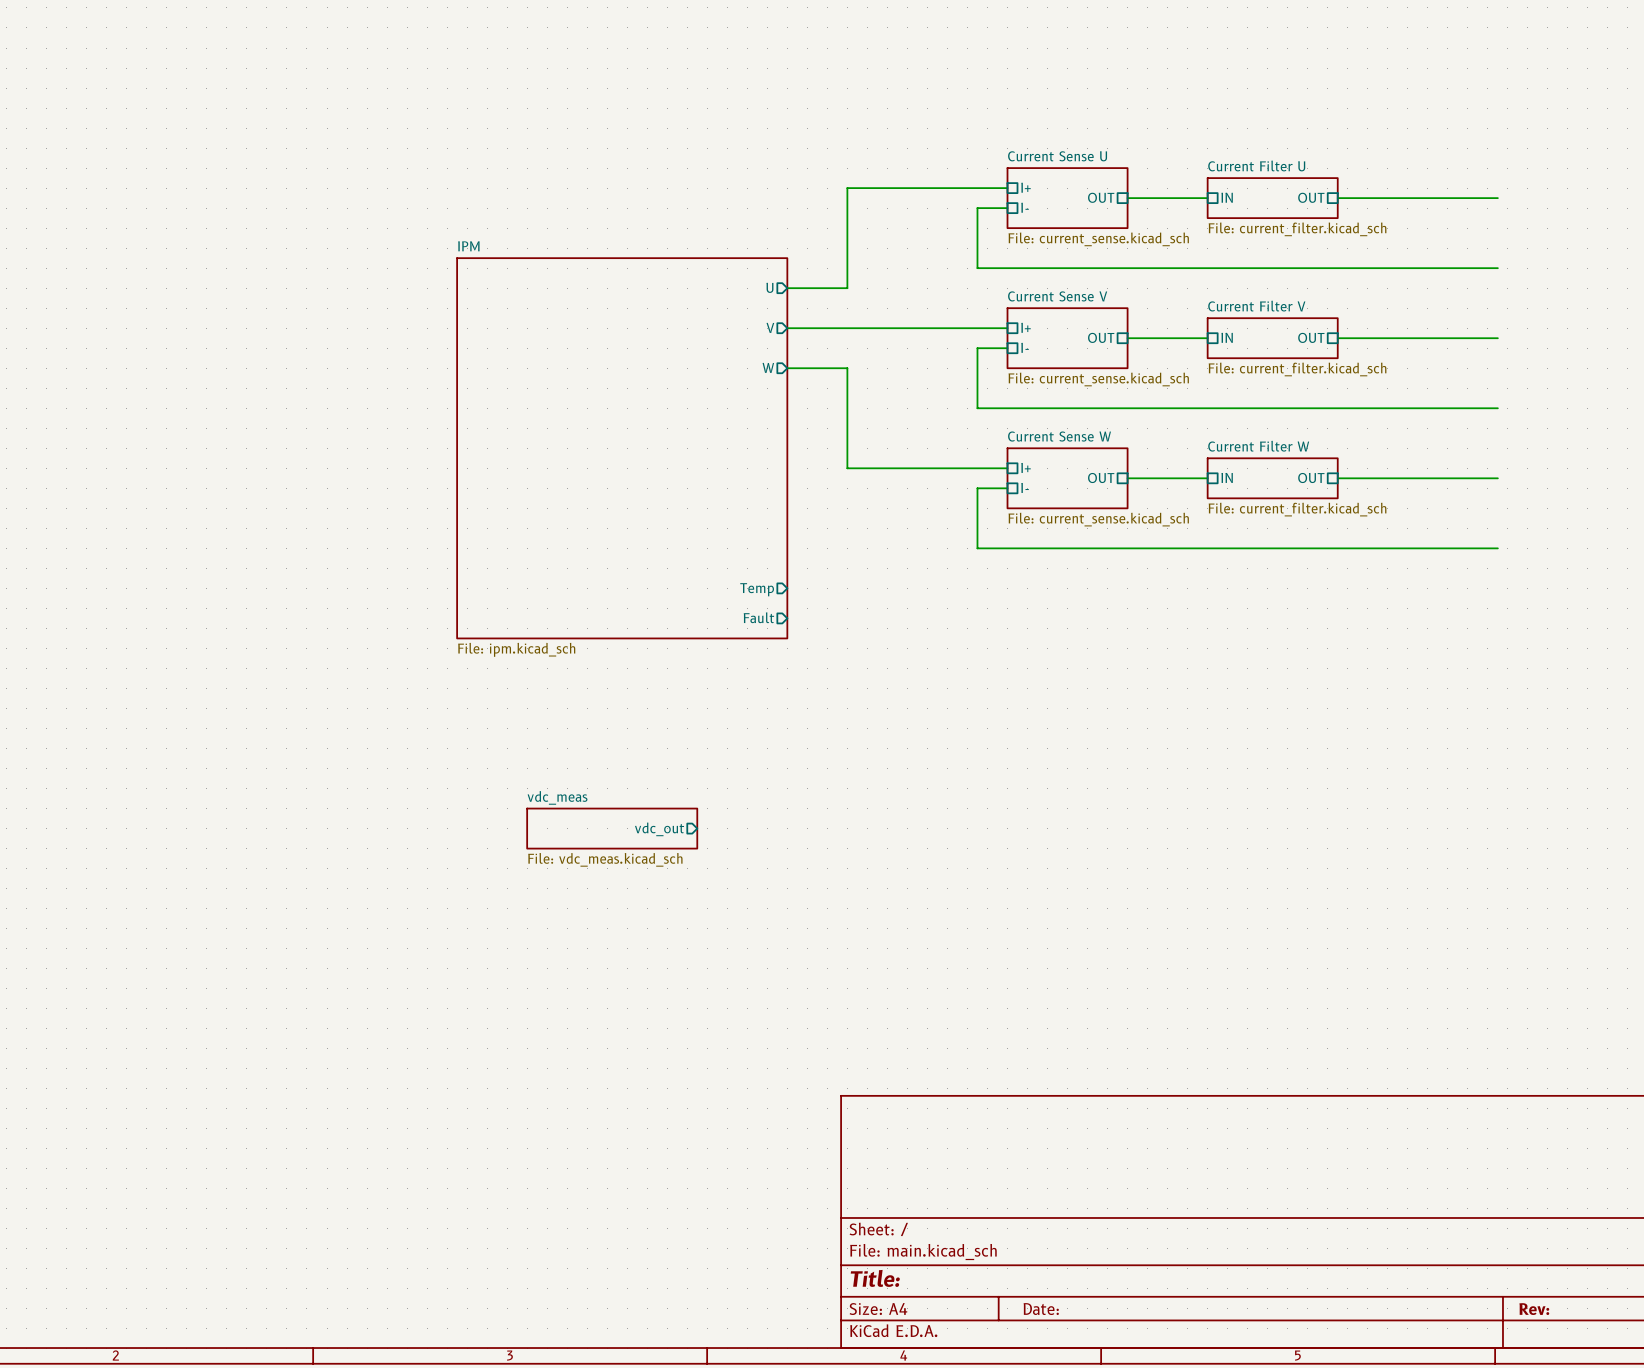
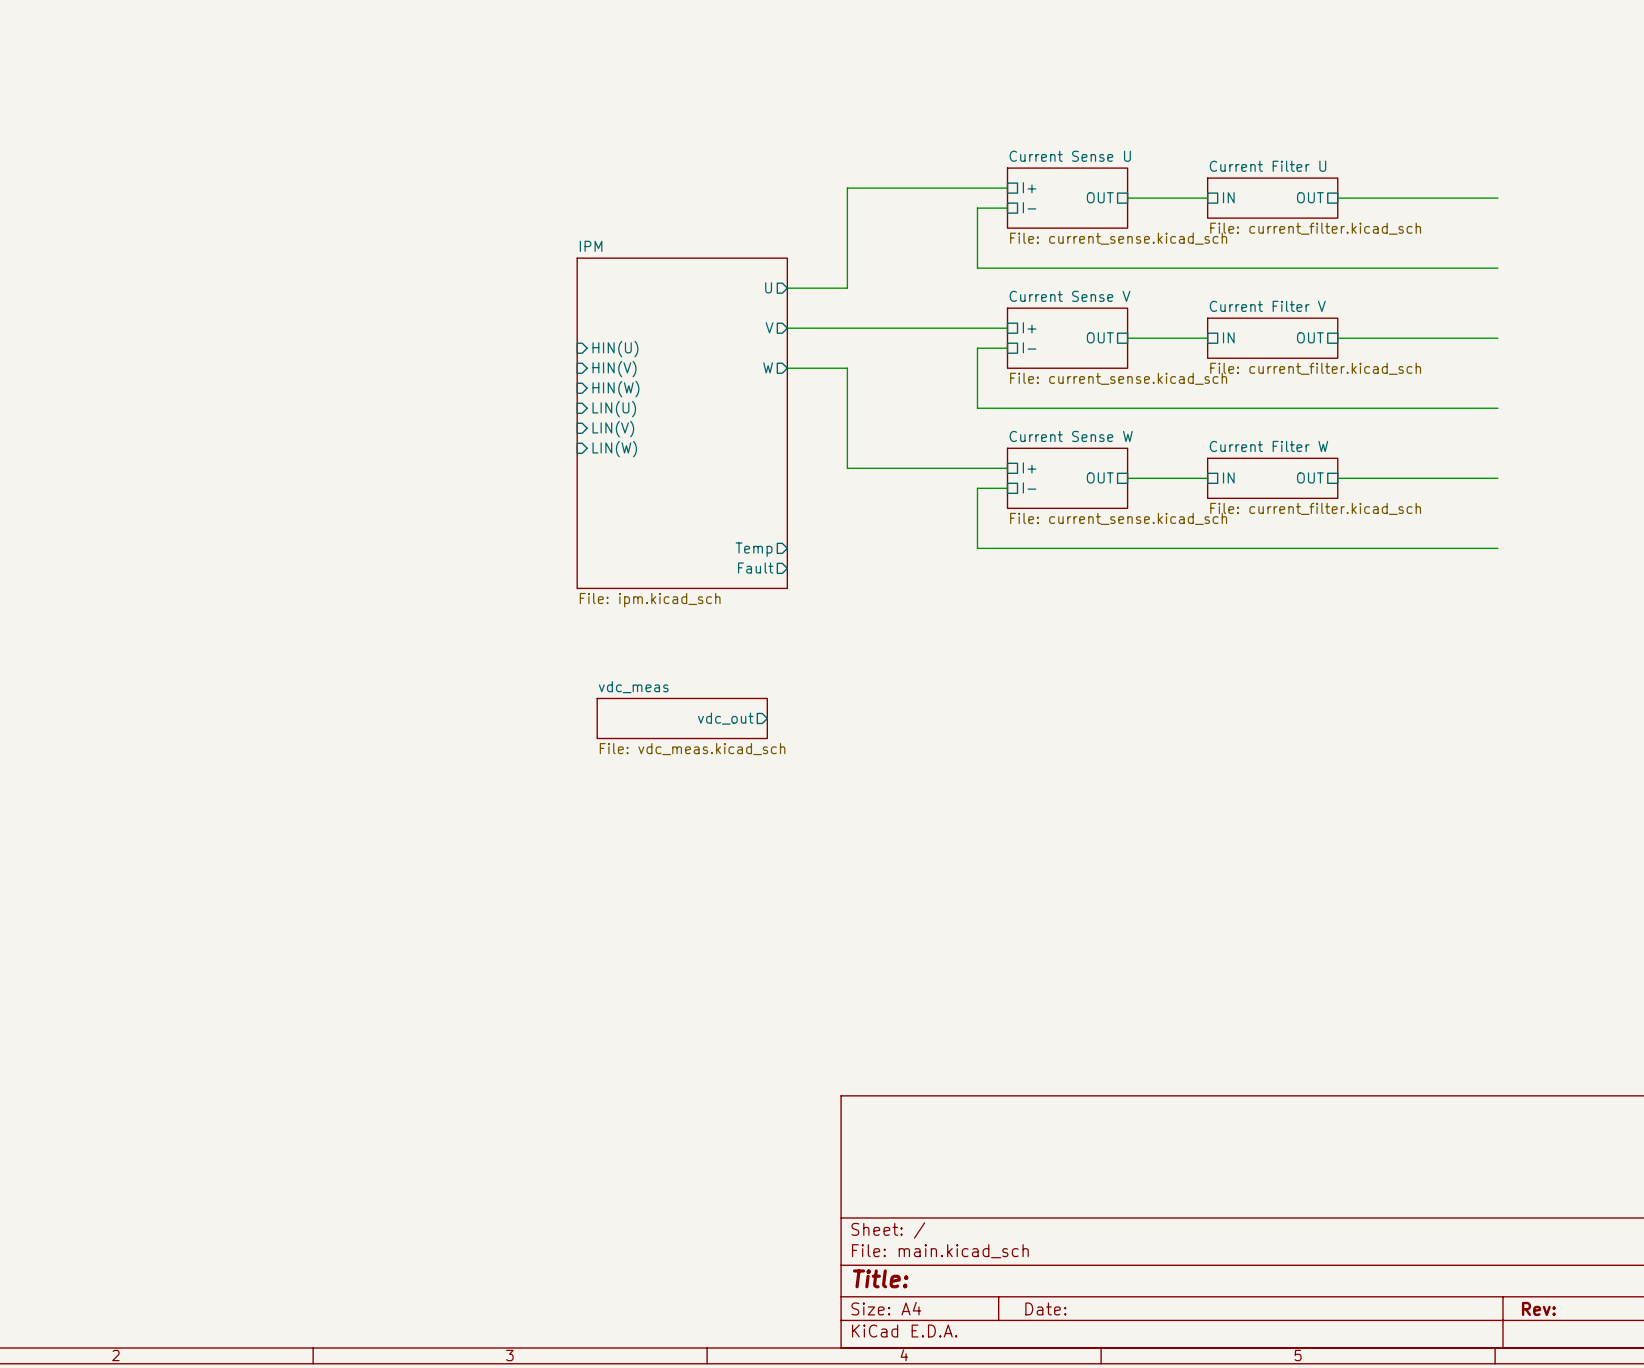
sheet pin: none -> HIN(U) (615, 349)
sheet pin: none -> HIN(V) (614, 369)
sheet pin: none -> HIN(W) (615, 389)
sheet pin: none -> LIN(U) (614, 409)
sheet IPM: none -> File: ipm.kicad_sch (682, 423)
sheet pin: none -> LIN(V) (613, 429)
sheet IPM: File: ipm.kicad_sch (622, 448) -> none
sheet pin: none -> LIN(W) (614, 449)
sheet pin position: Temp (757, 589) -> Temp (754, 549)
sheet pin position: Fault (758, 617) -> Fault (755, 568)
sheet vdc_meas position: (612, 828) -> (682, 718)
sheet pin position: vdc_out (659, 829) -> vdc_out (725, 718)

